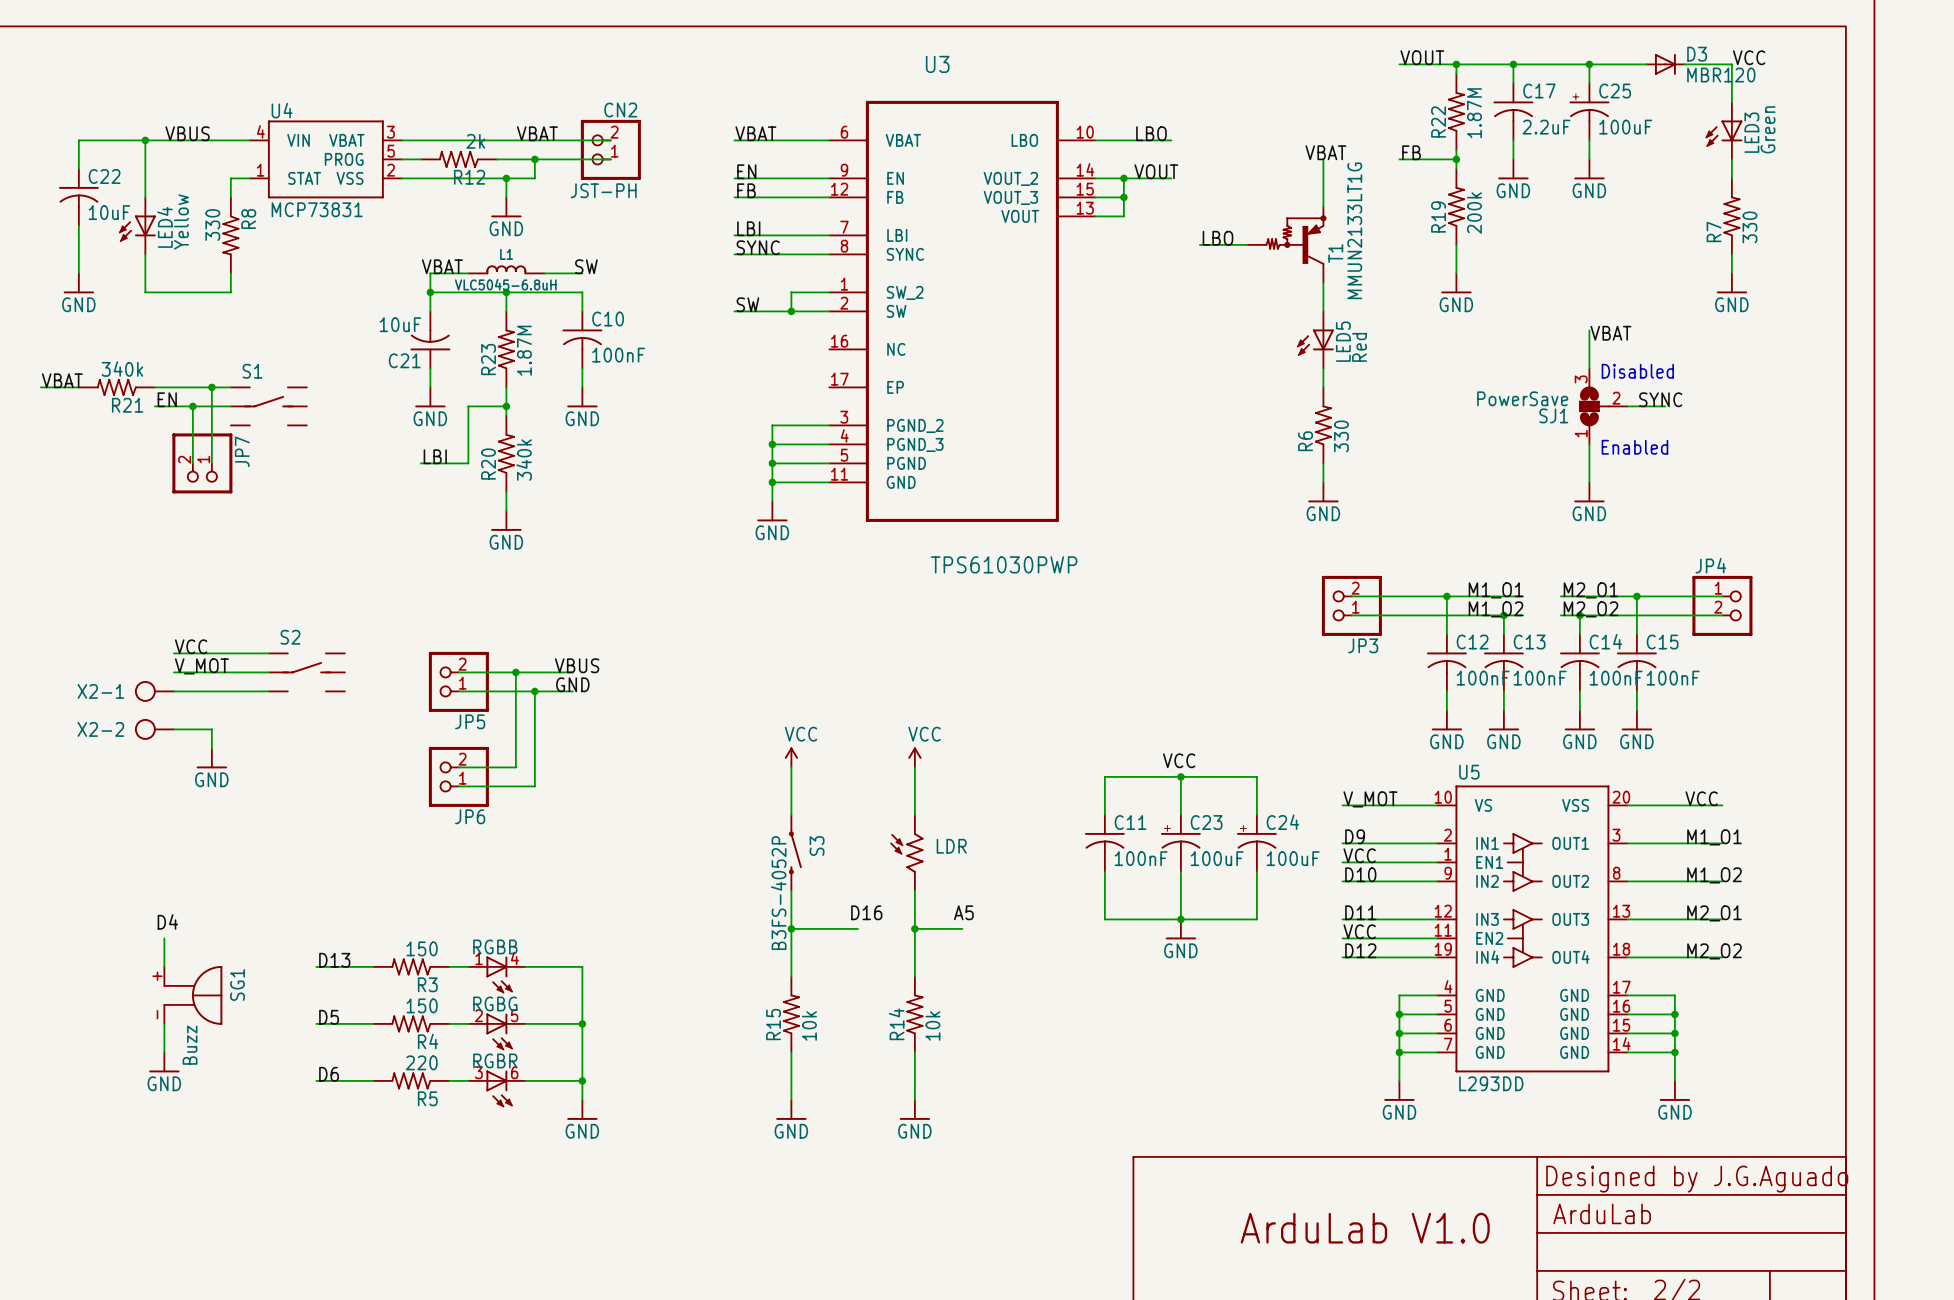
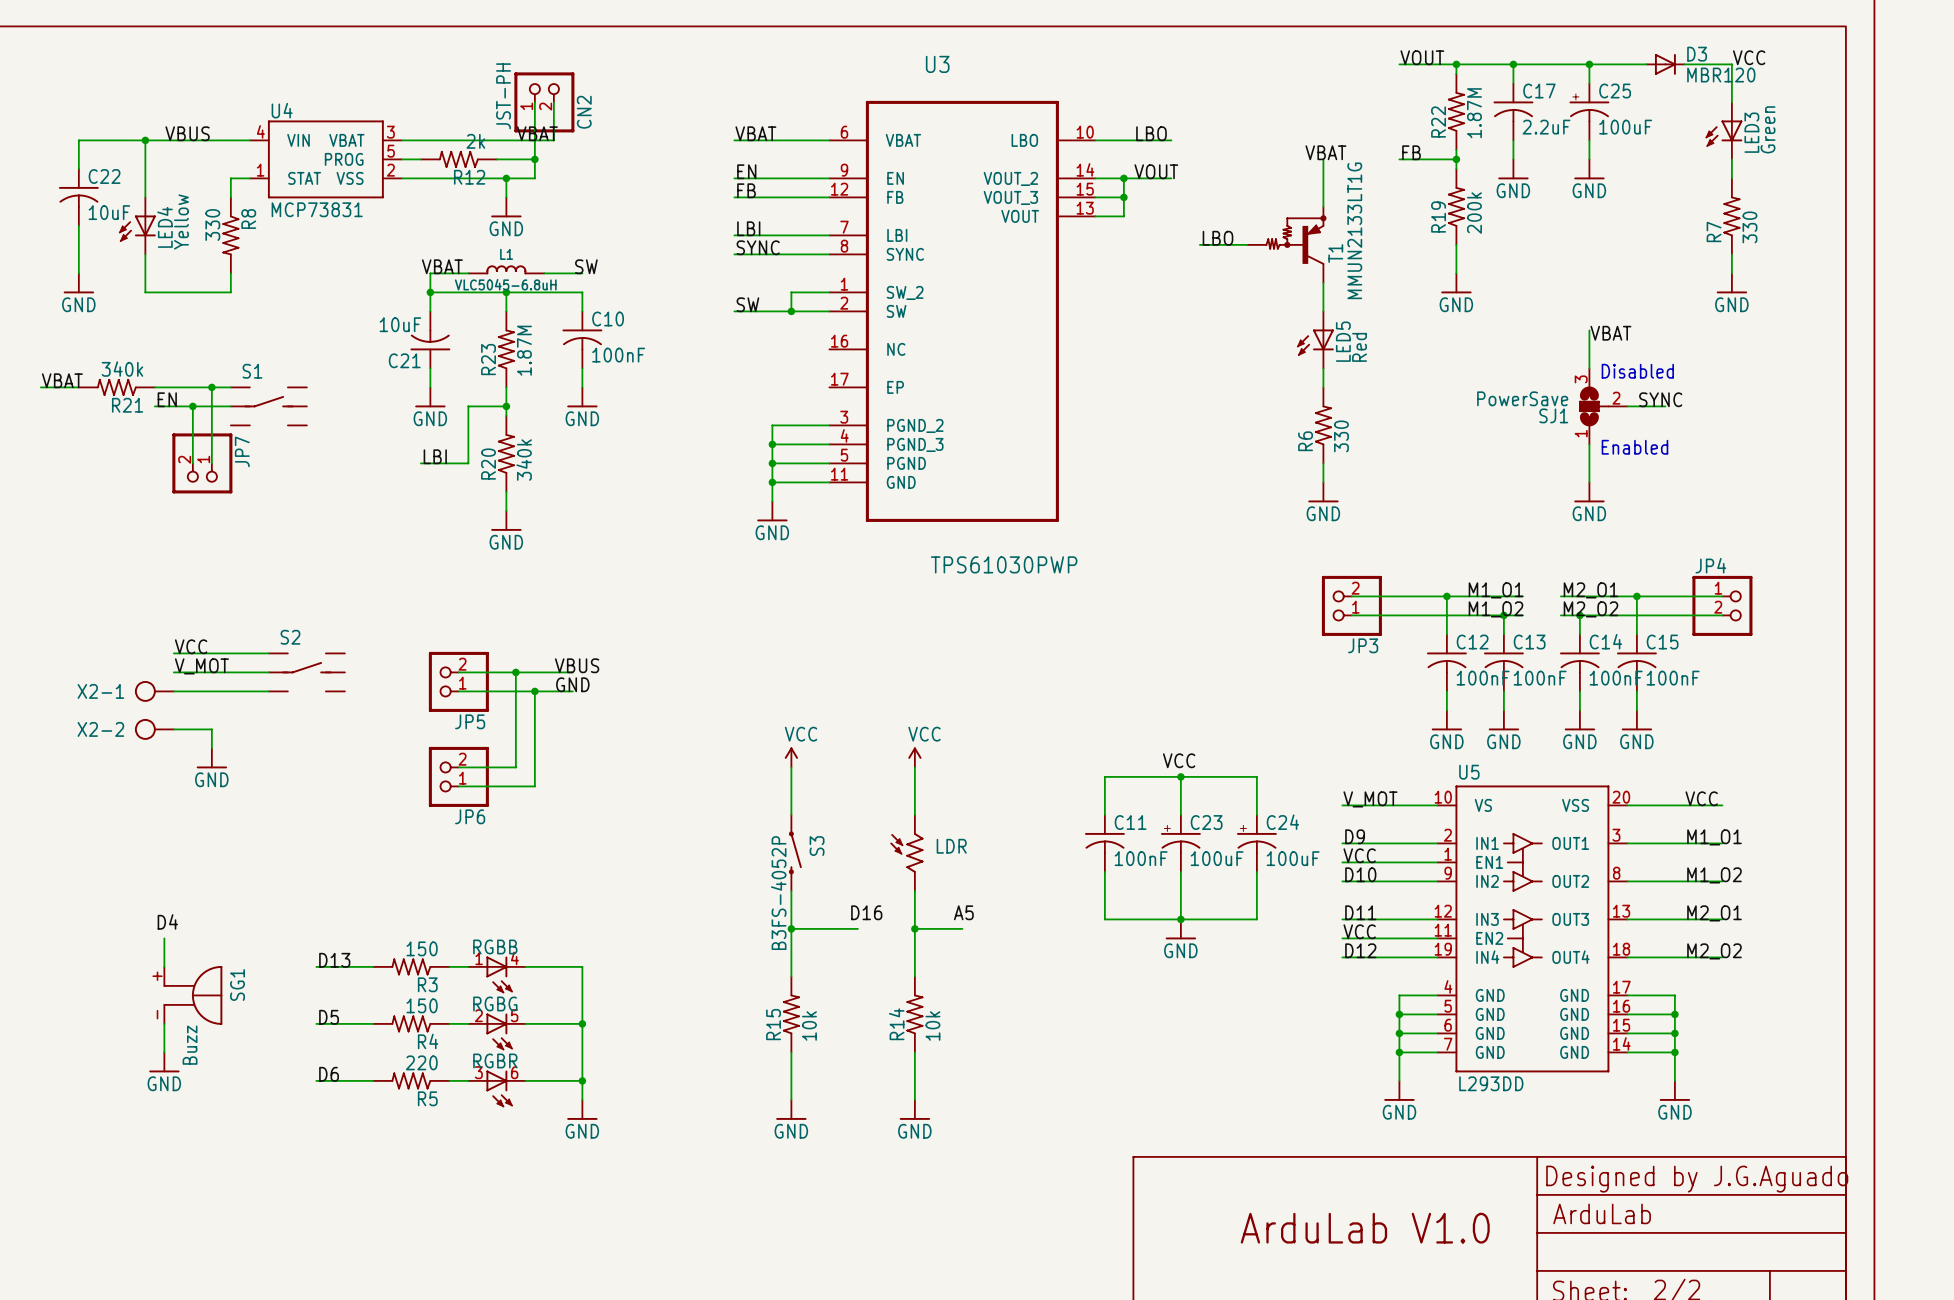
wire: (553, 140) (610, 140) -> (553, 140) (553, 102)
CN2 rotation: 0° (610, 149) -> 90° clockwise (544, 102)
CN2 position: (610, 149) -> (544, 102)
wire: (534, 159) (610, 159) -> (534, 159) (534, 102)

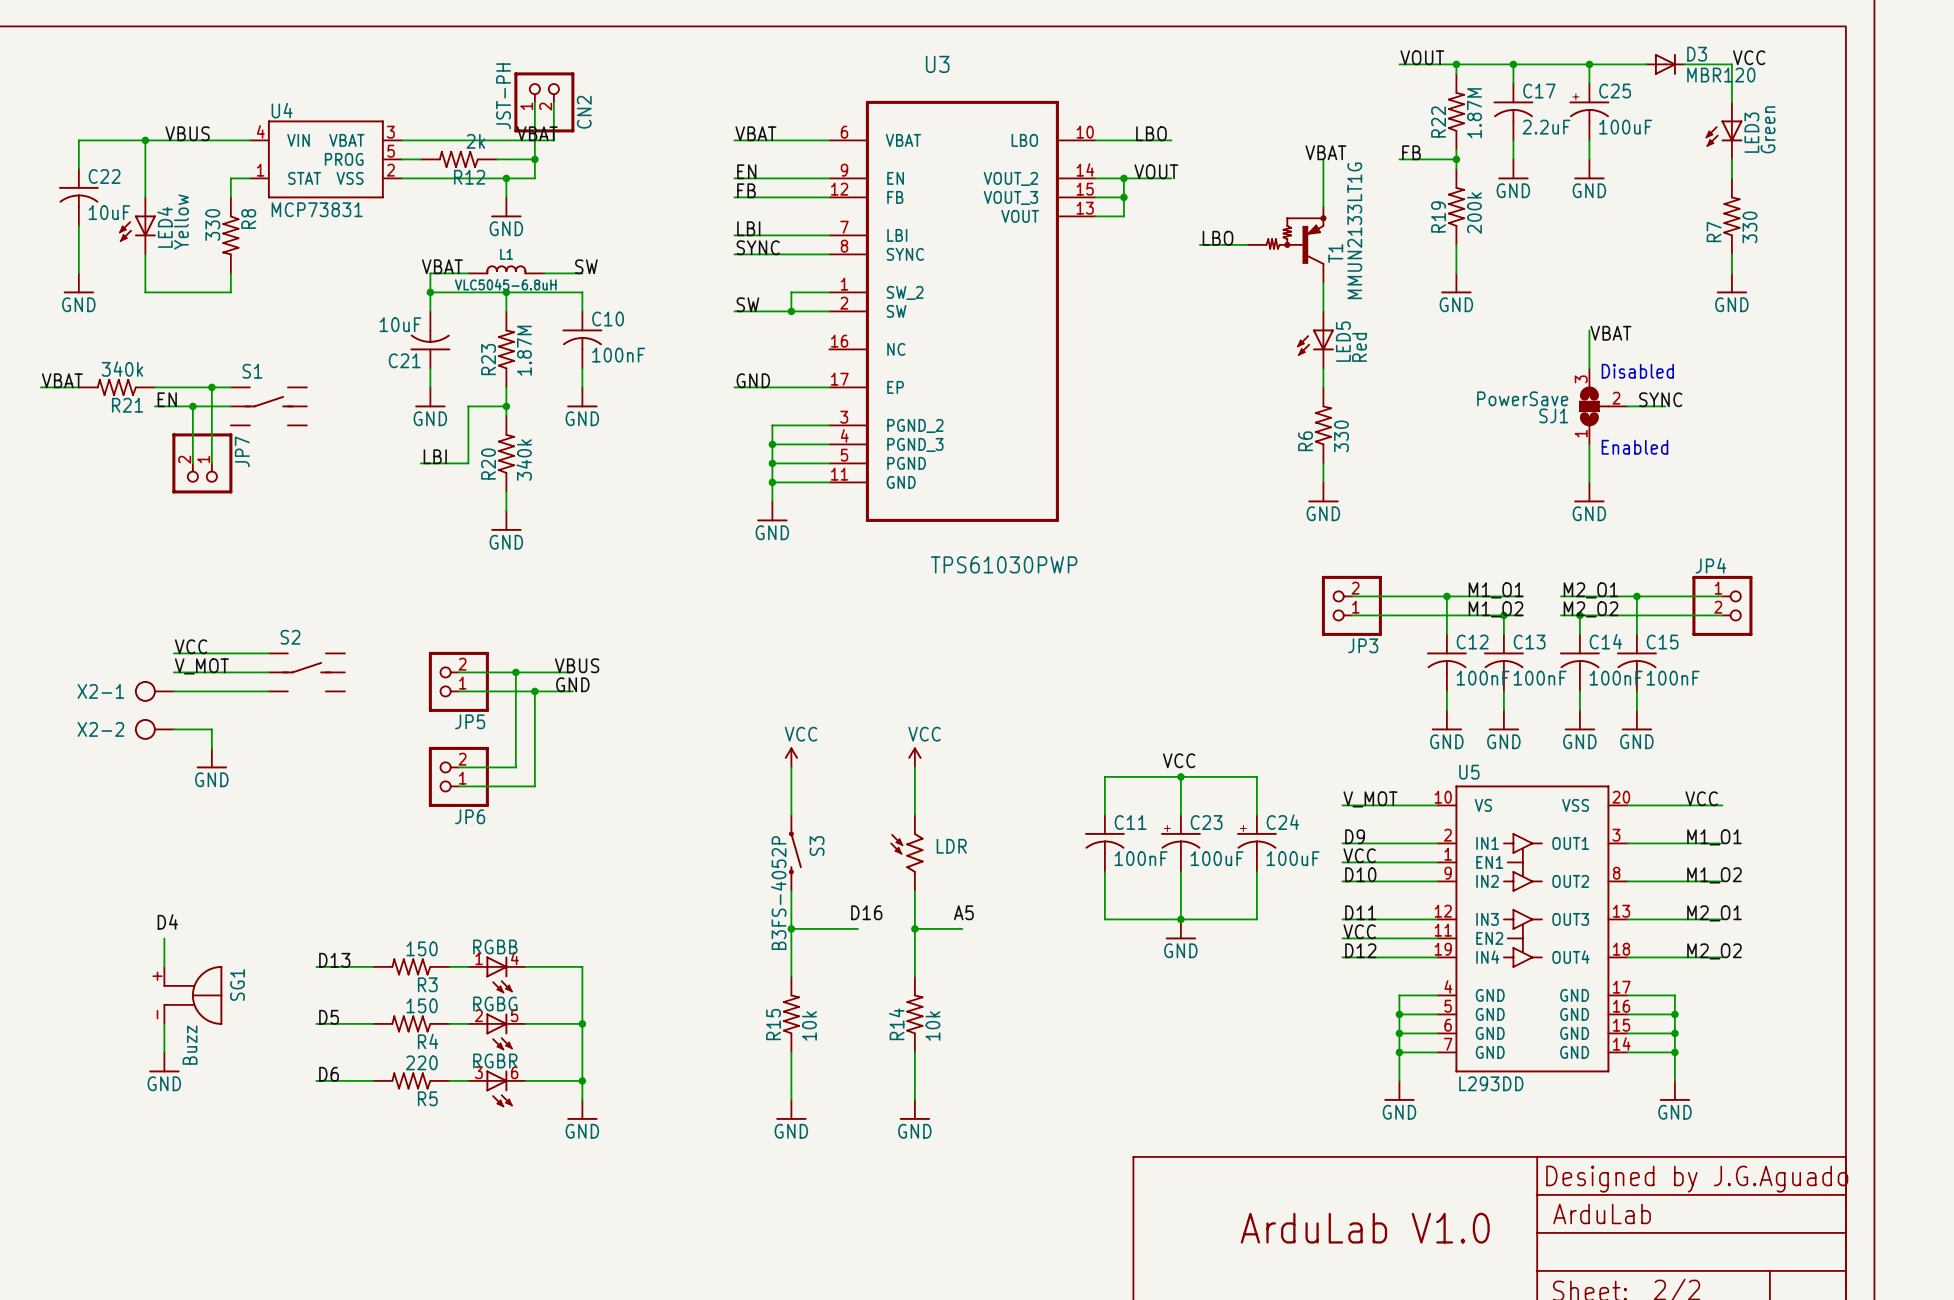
label: none -> GND (753, 380)
wire: none -> (734, 387) (829, 387)

